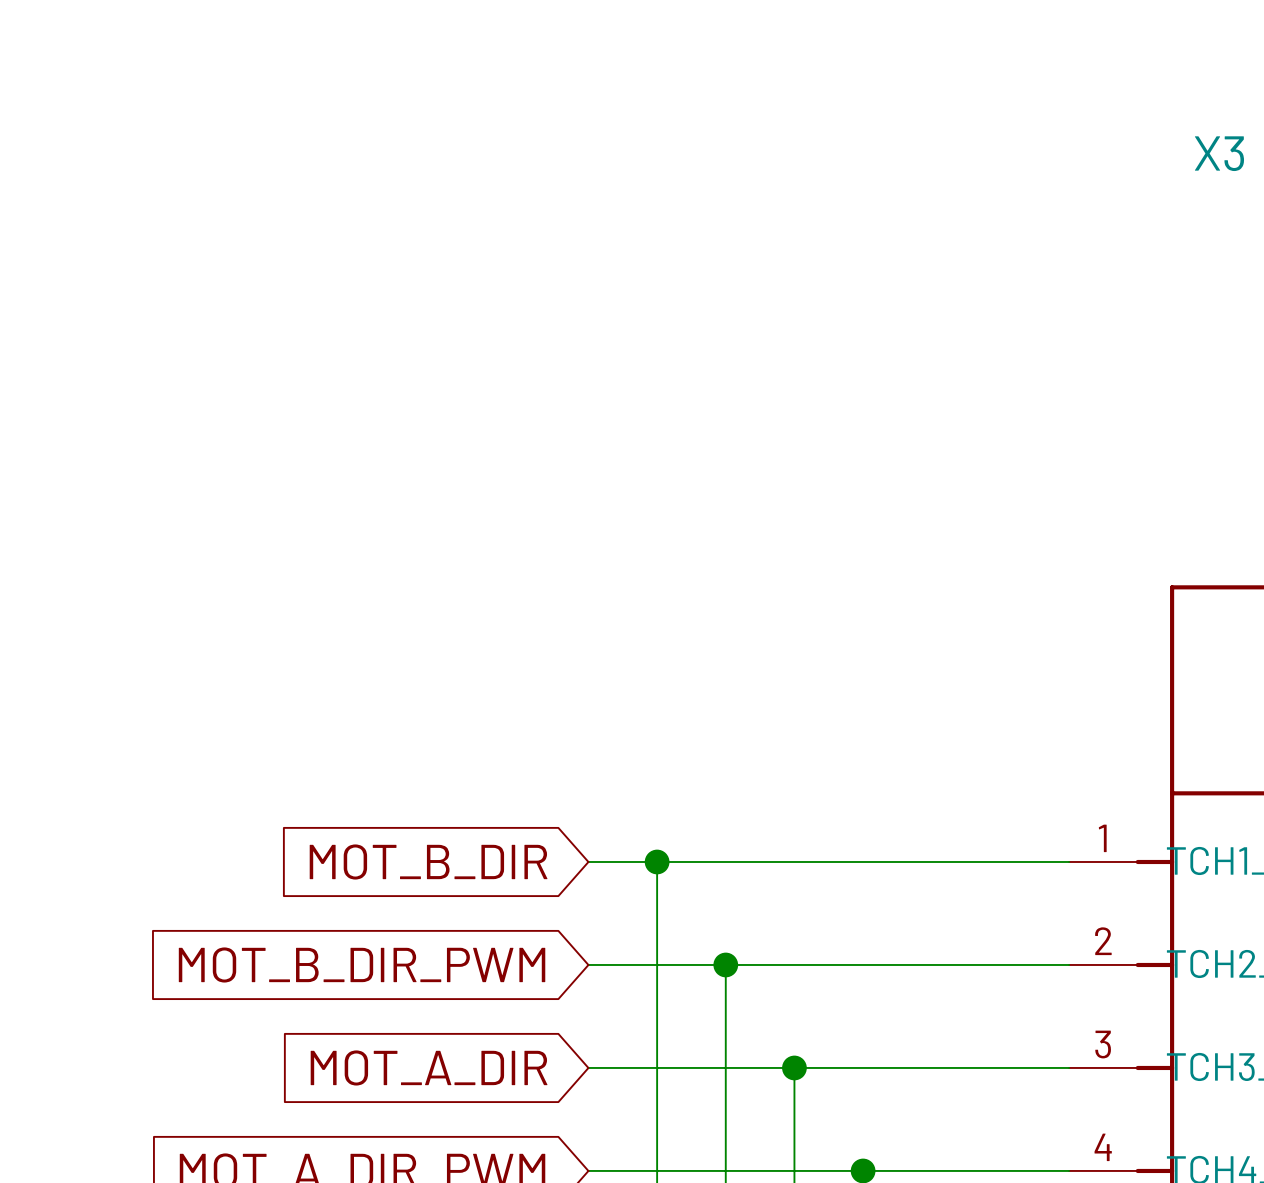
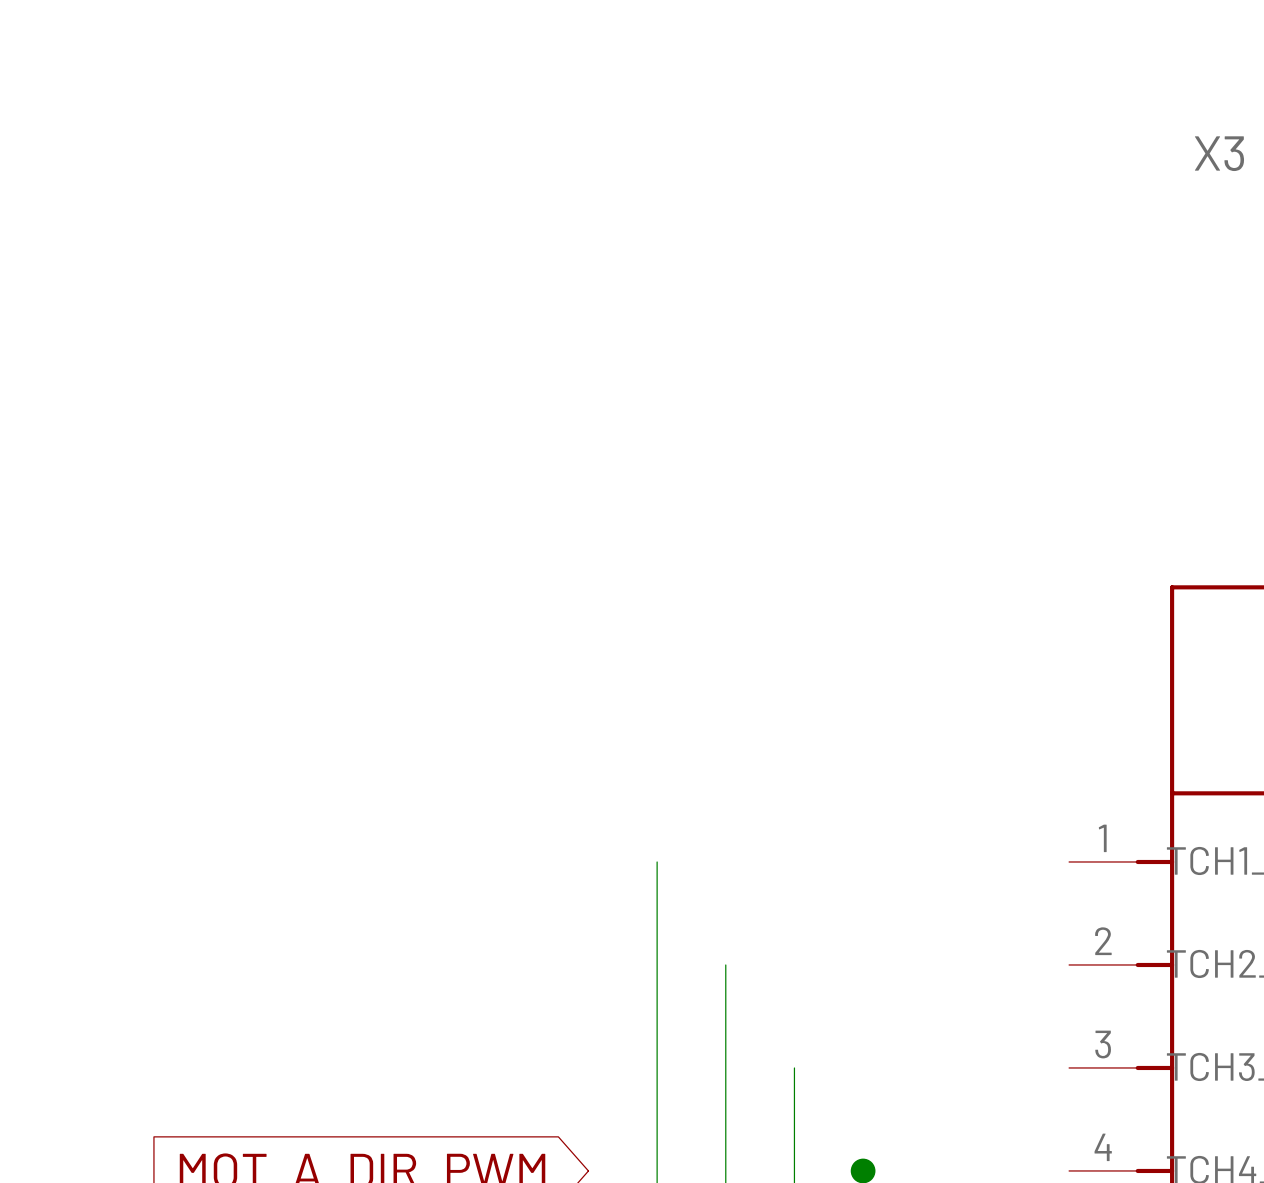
global label: MOT_B_DIR (428, 861) -> none
wire: (588, 861) (1069, 861) -> none
junction: (657, 861) -> none
global label: MOT_B_DIR_PWM (362, 964) -> none
wire: (588, 964) (1069, 964) -> none
junction: (725, 964) -> none
global label: MOT_A_DIR (429, 1067) -> none
wire: (588, 1067) (1069, 1067) -> none
junction: (794, 1067) -> none
wire: (588, 1170) (1069, 1170) -> none

